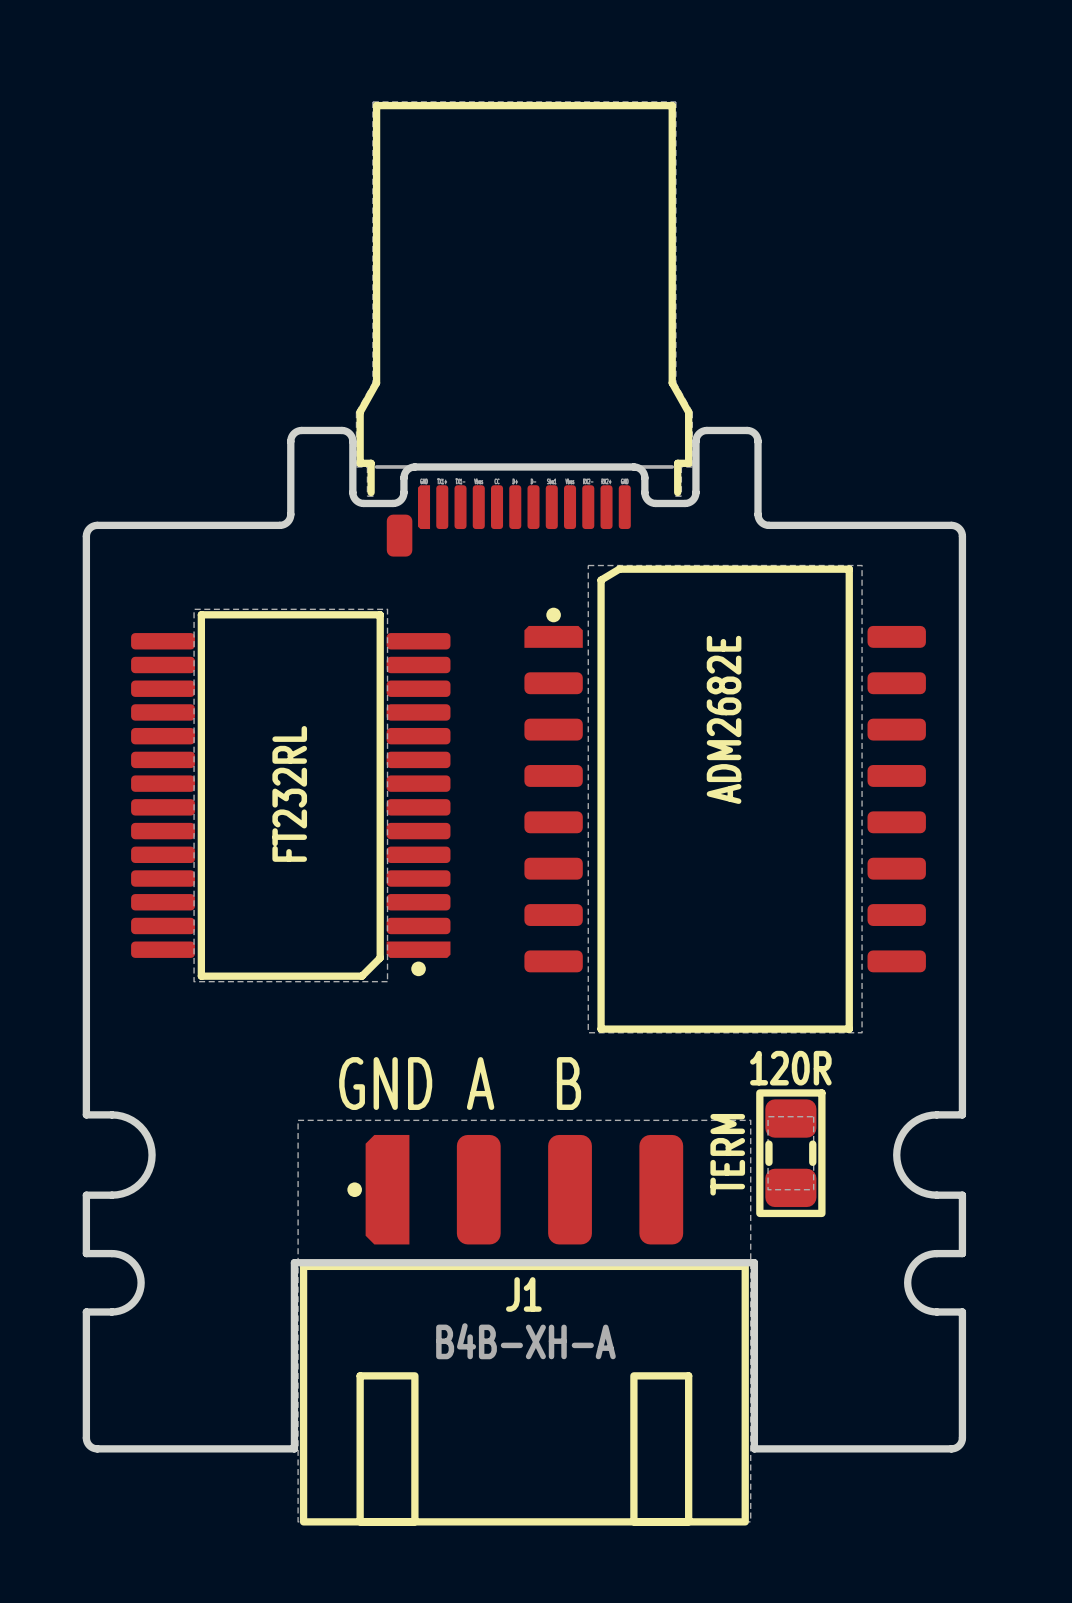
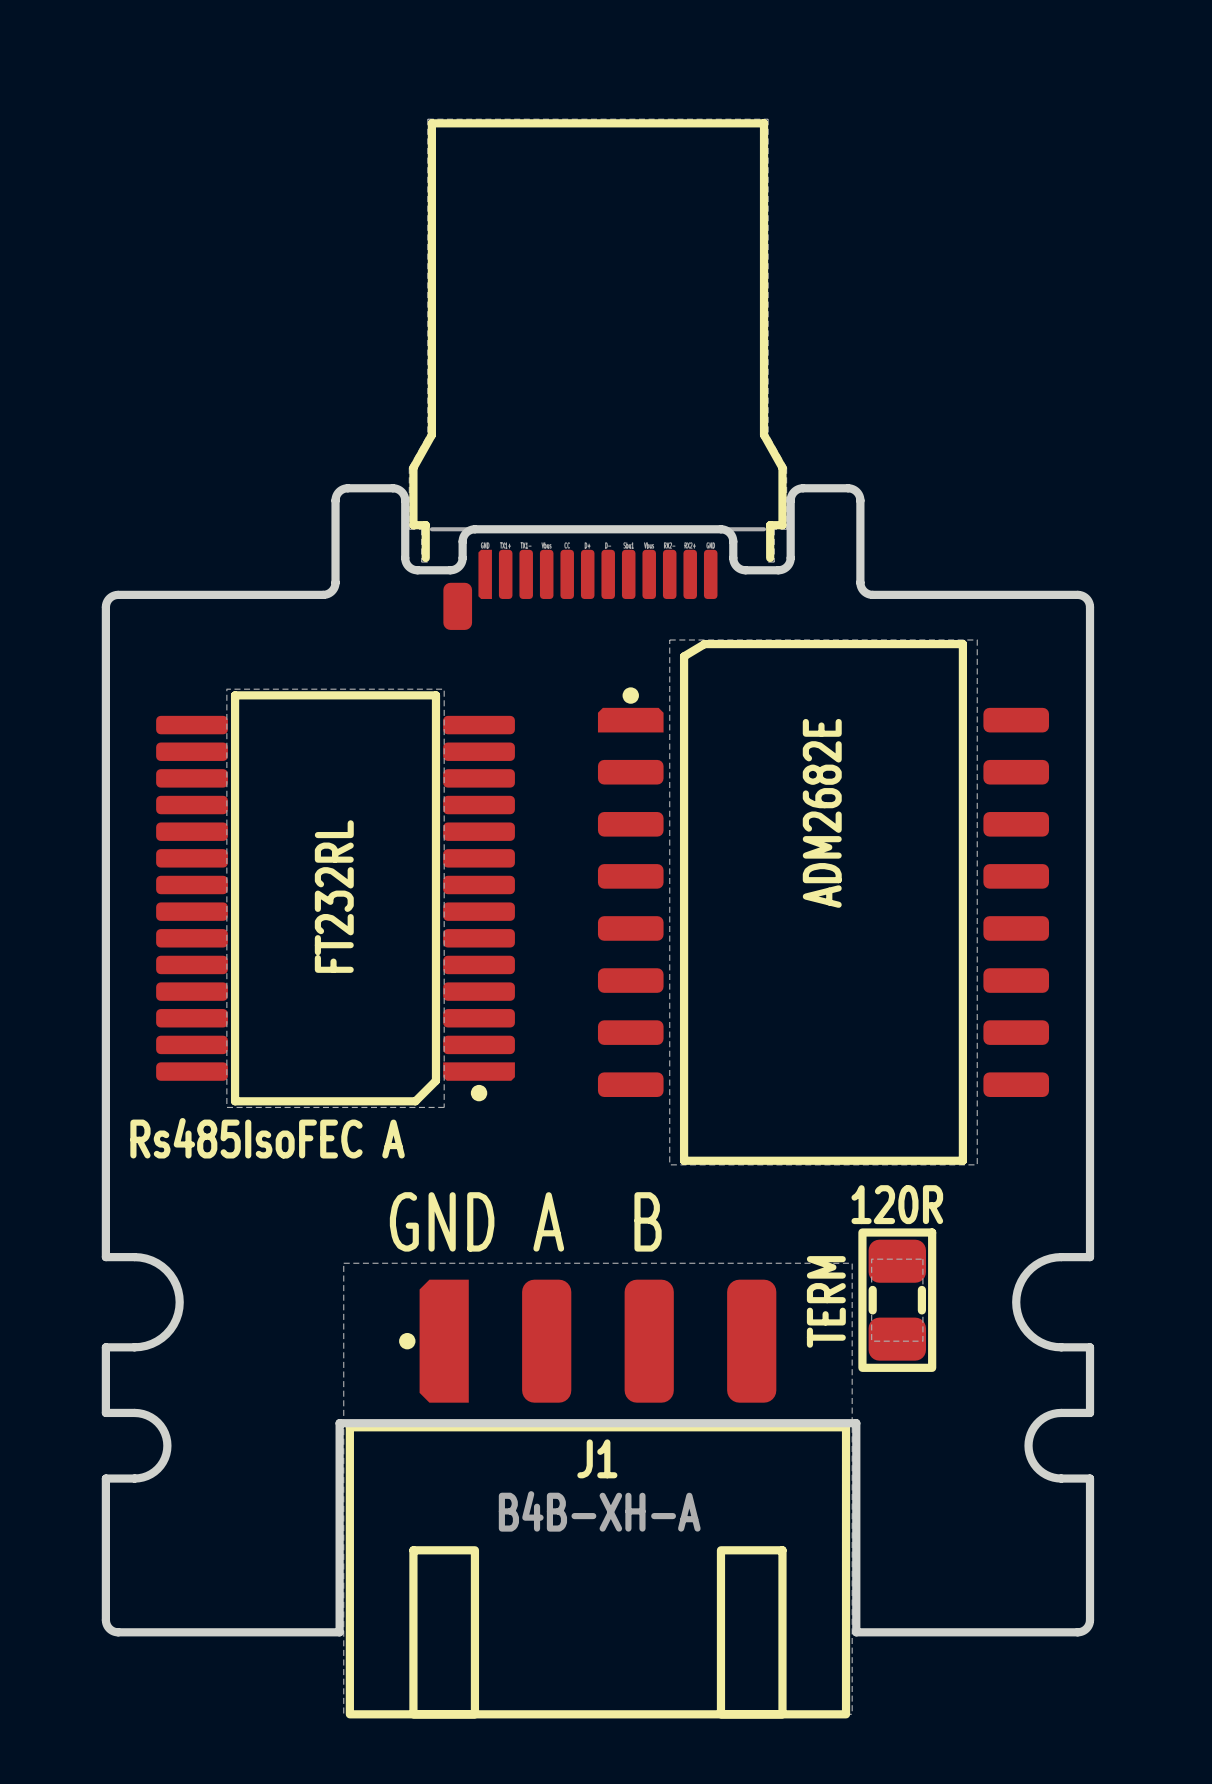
text: none -> Rs485IsoFEC A (267, 1138)

